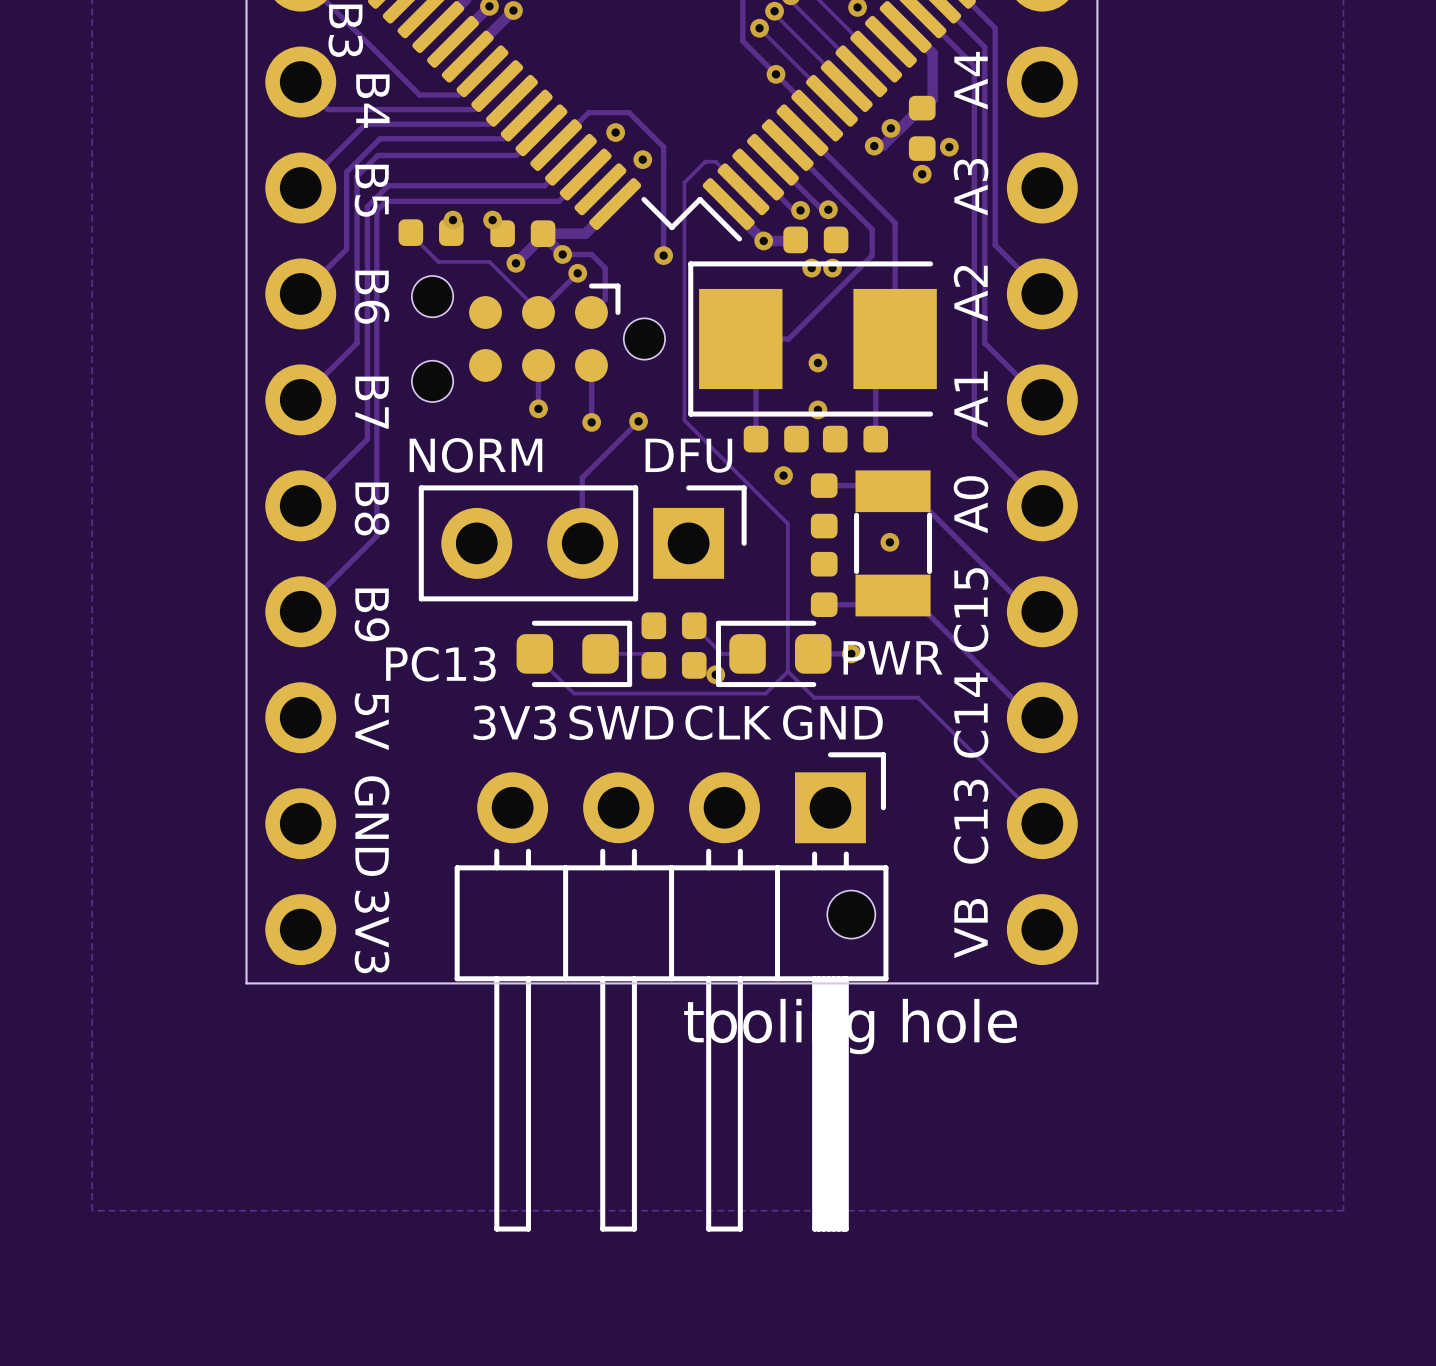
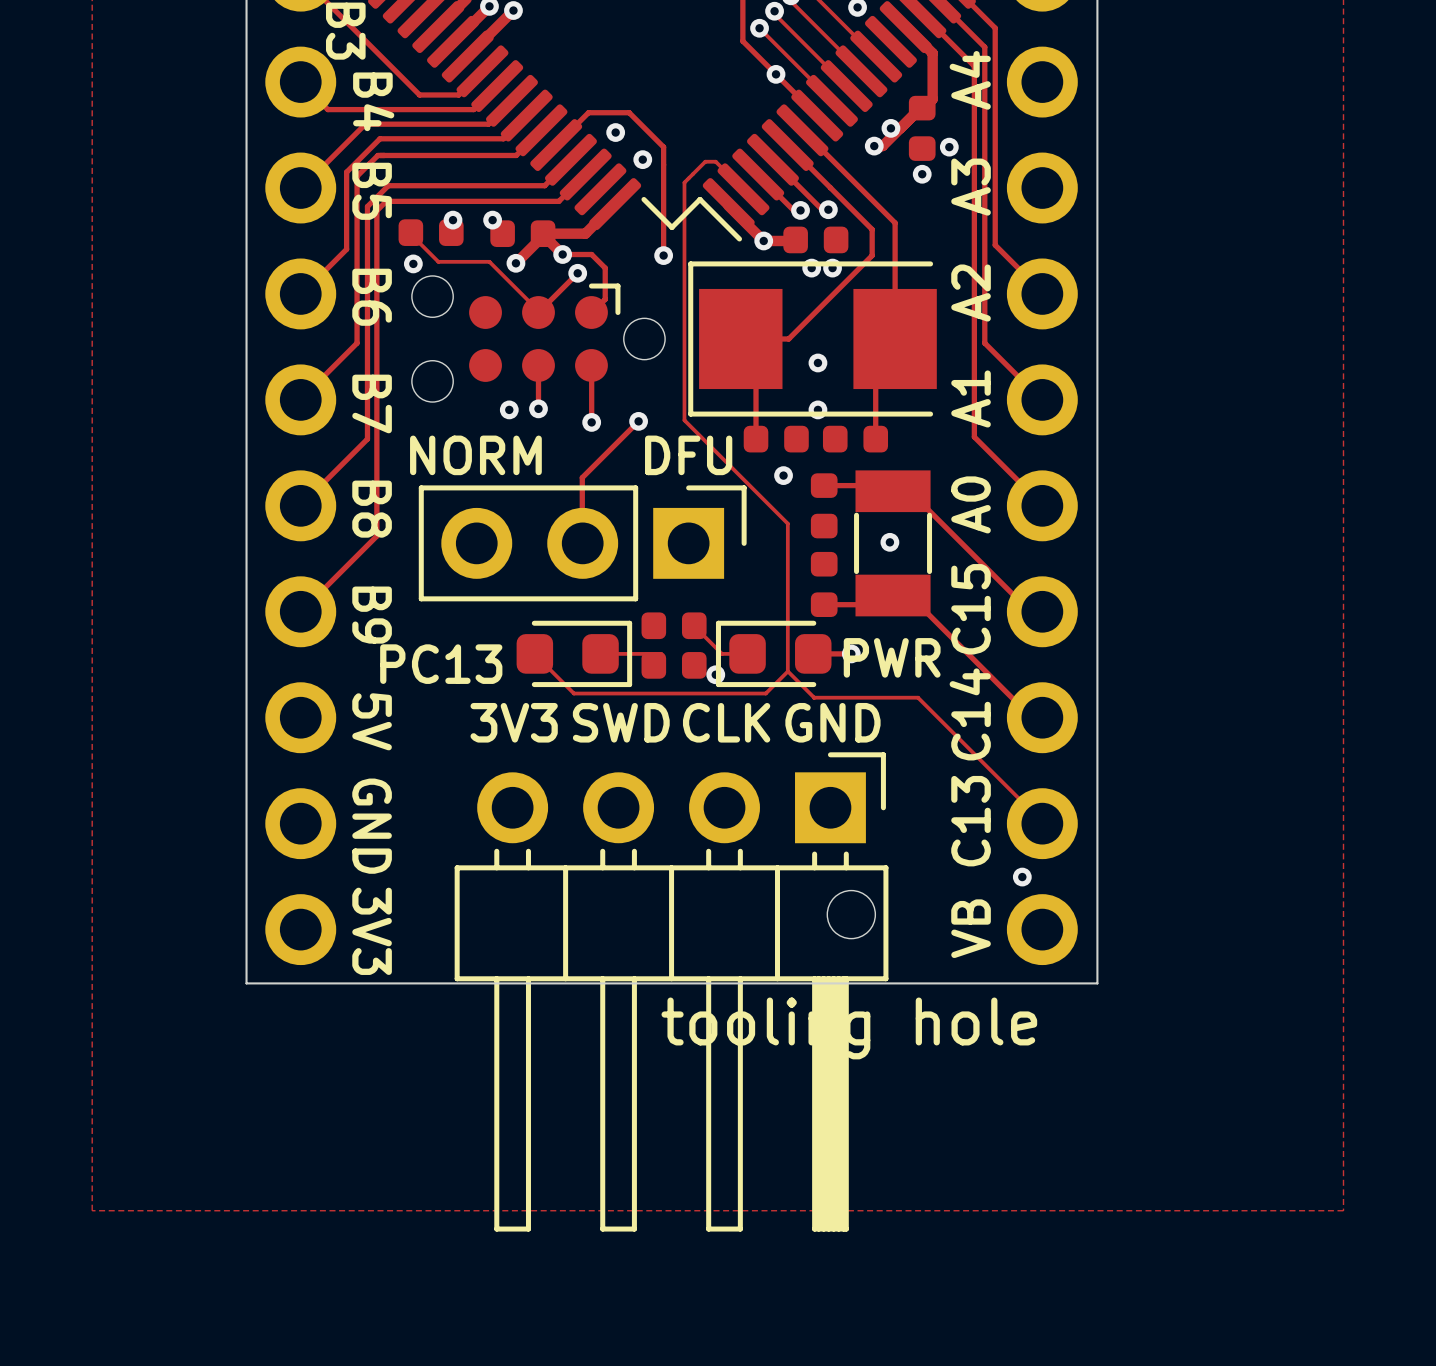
via: none -> (413, 263)
via: none -> (509, 409)
via: none -> (1022, 877)

